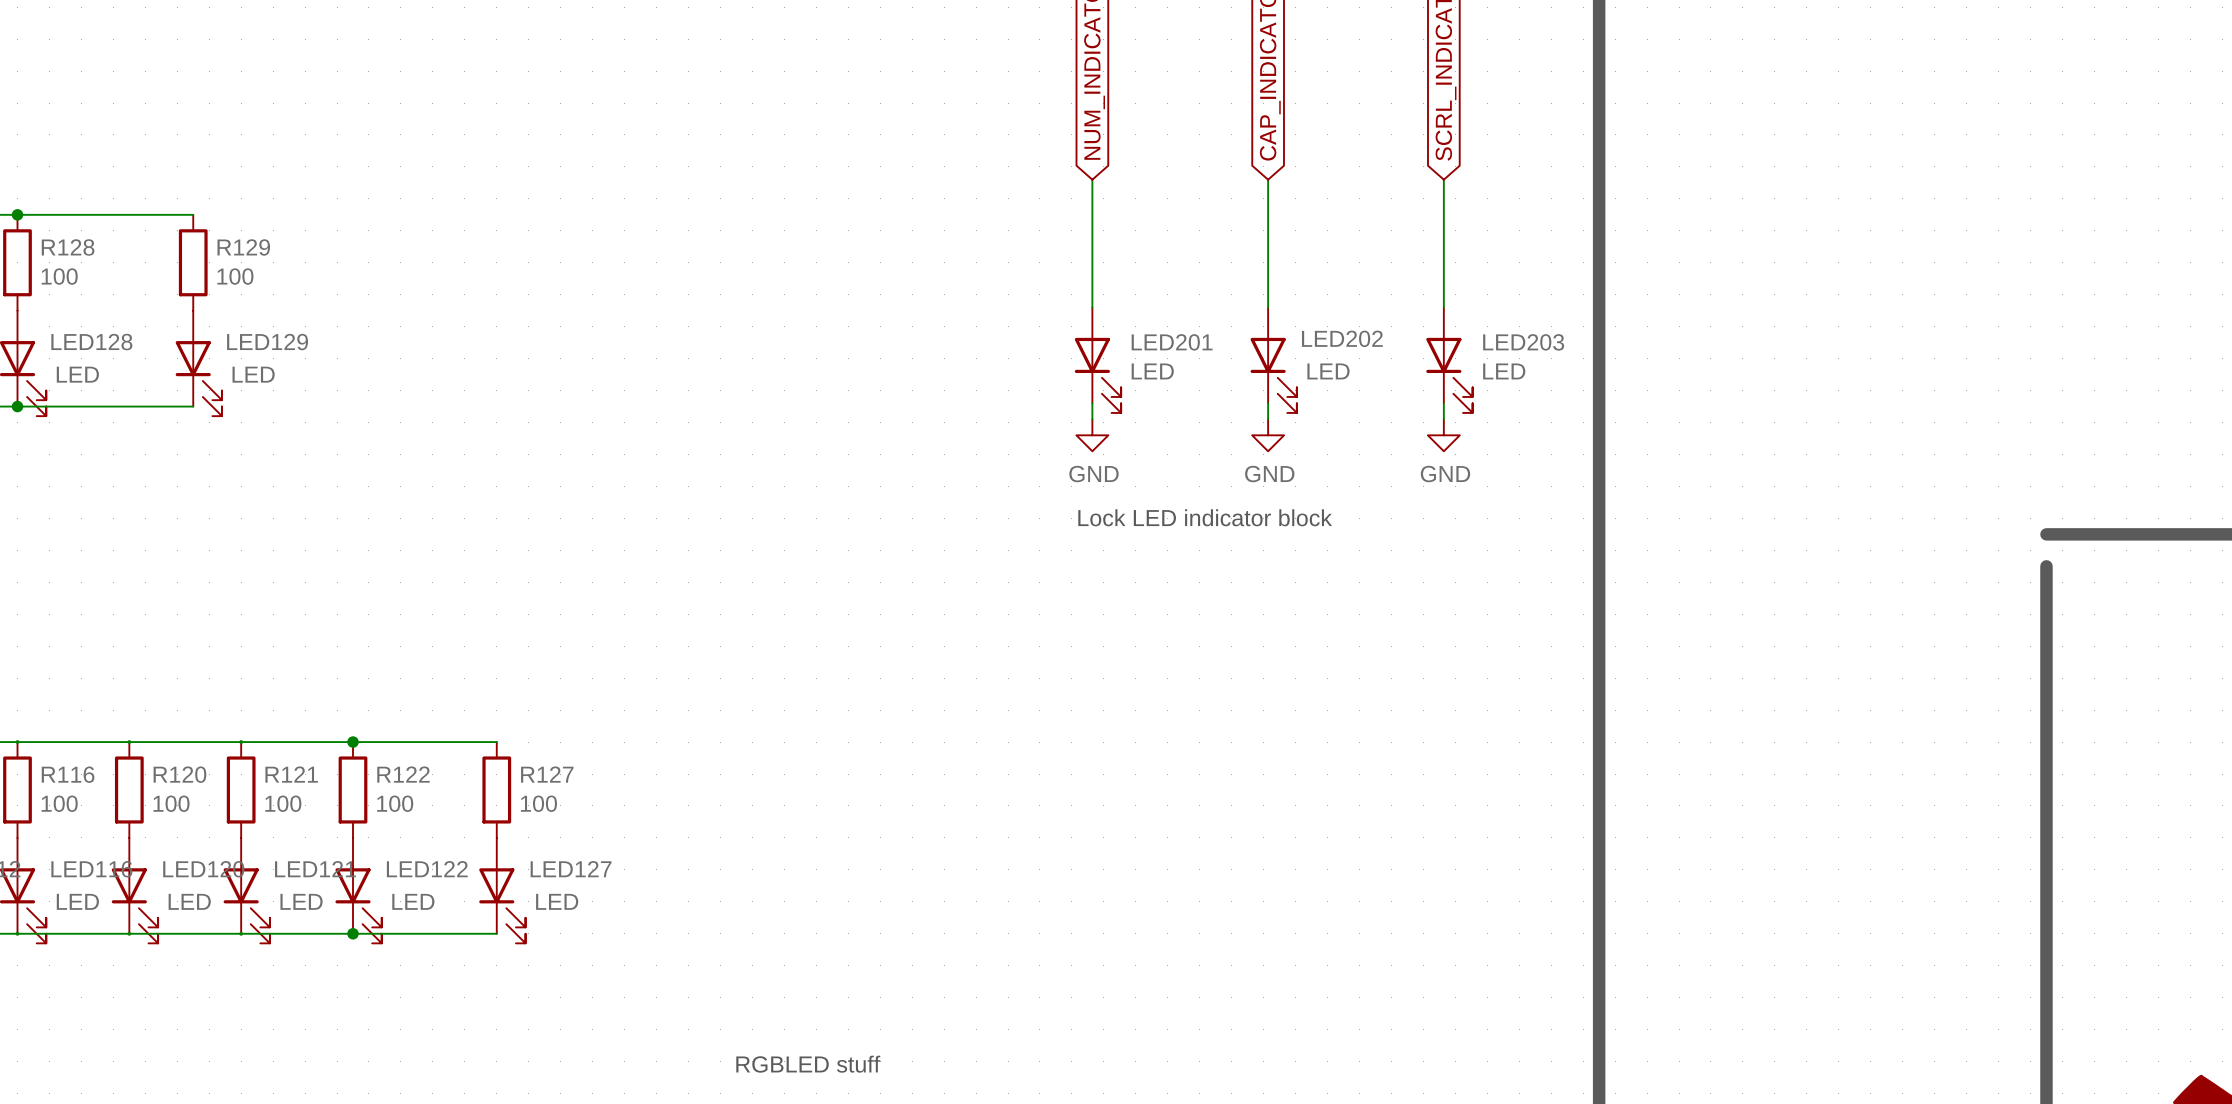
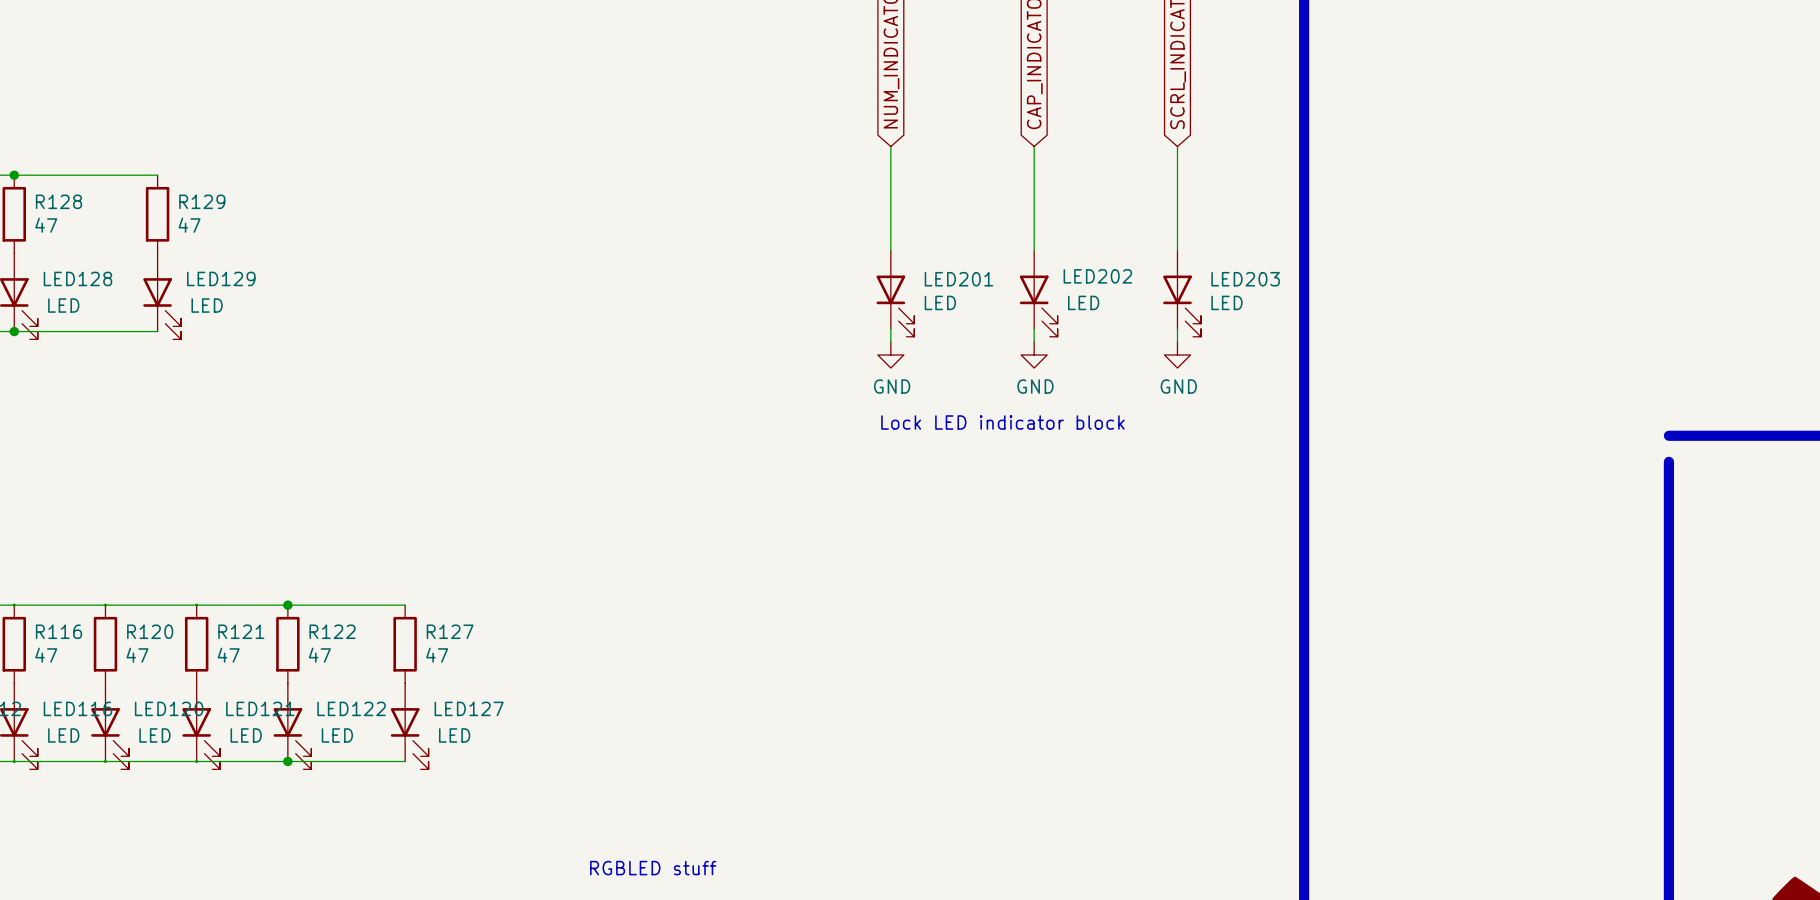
R128 value: 100 (59, 276) -> 47 (46, 225)
R129 value: 100 (235, 276) -> 47 (189, 225)
R116 value: 100 (59, 803) -> 47 (46, 655)
R120 value: 100 (171, 803) -> 47 (137, 655)
R121 value: 100 (283, 803) -> 47 (228, 655)
R122 value: 100 (395, 803) -> 47 (319, 655)
R127 value: 100 (538, 803) -> 47 (437, 655)

